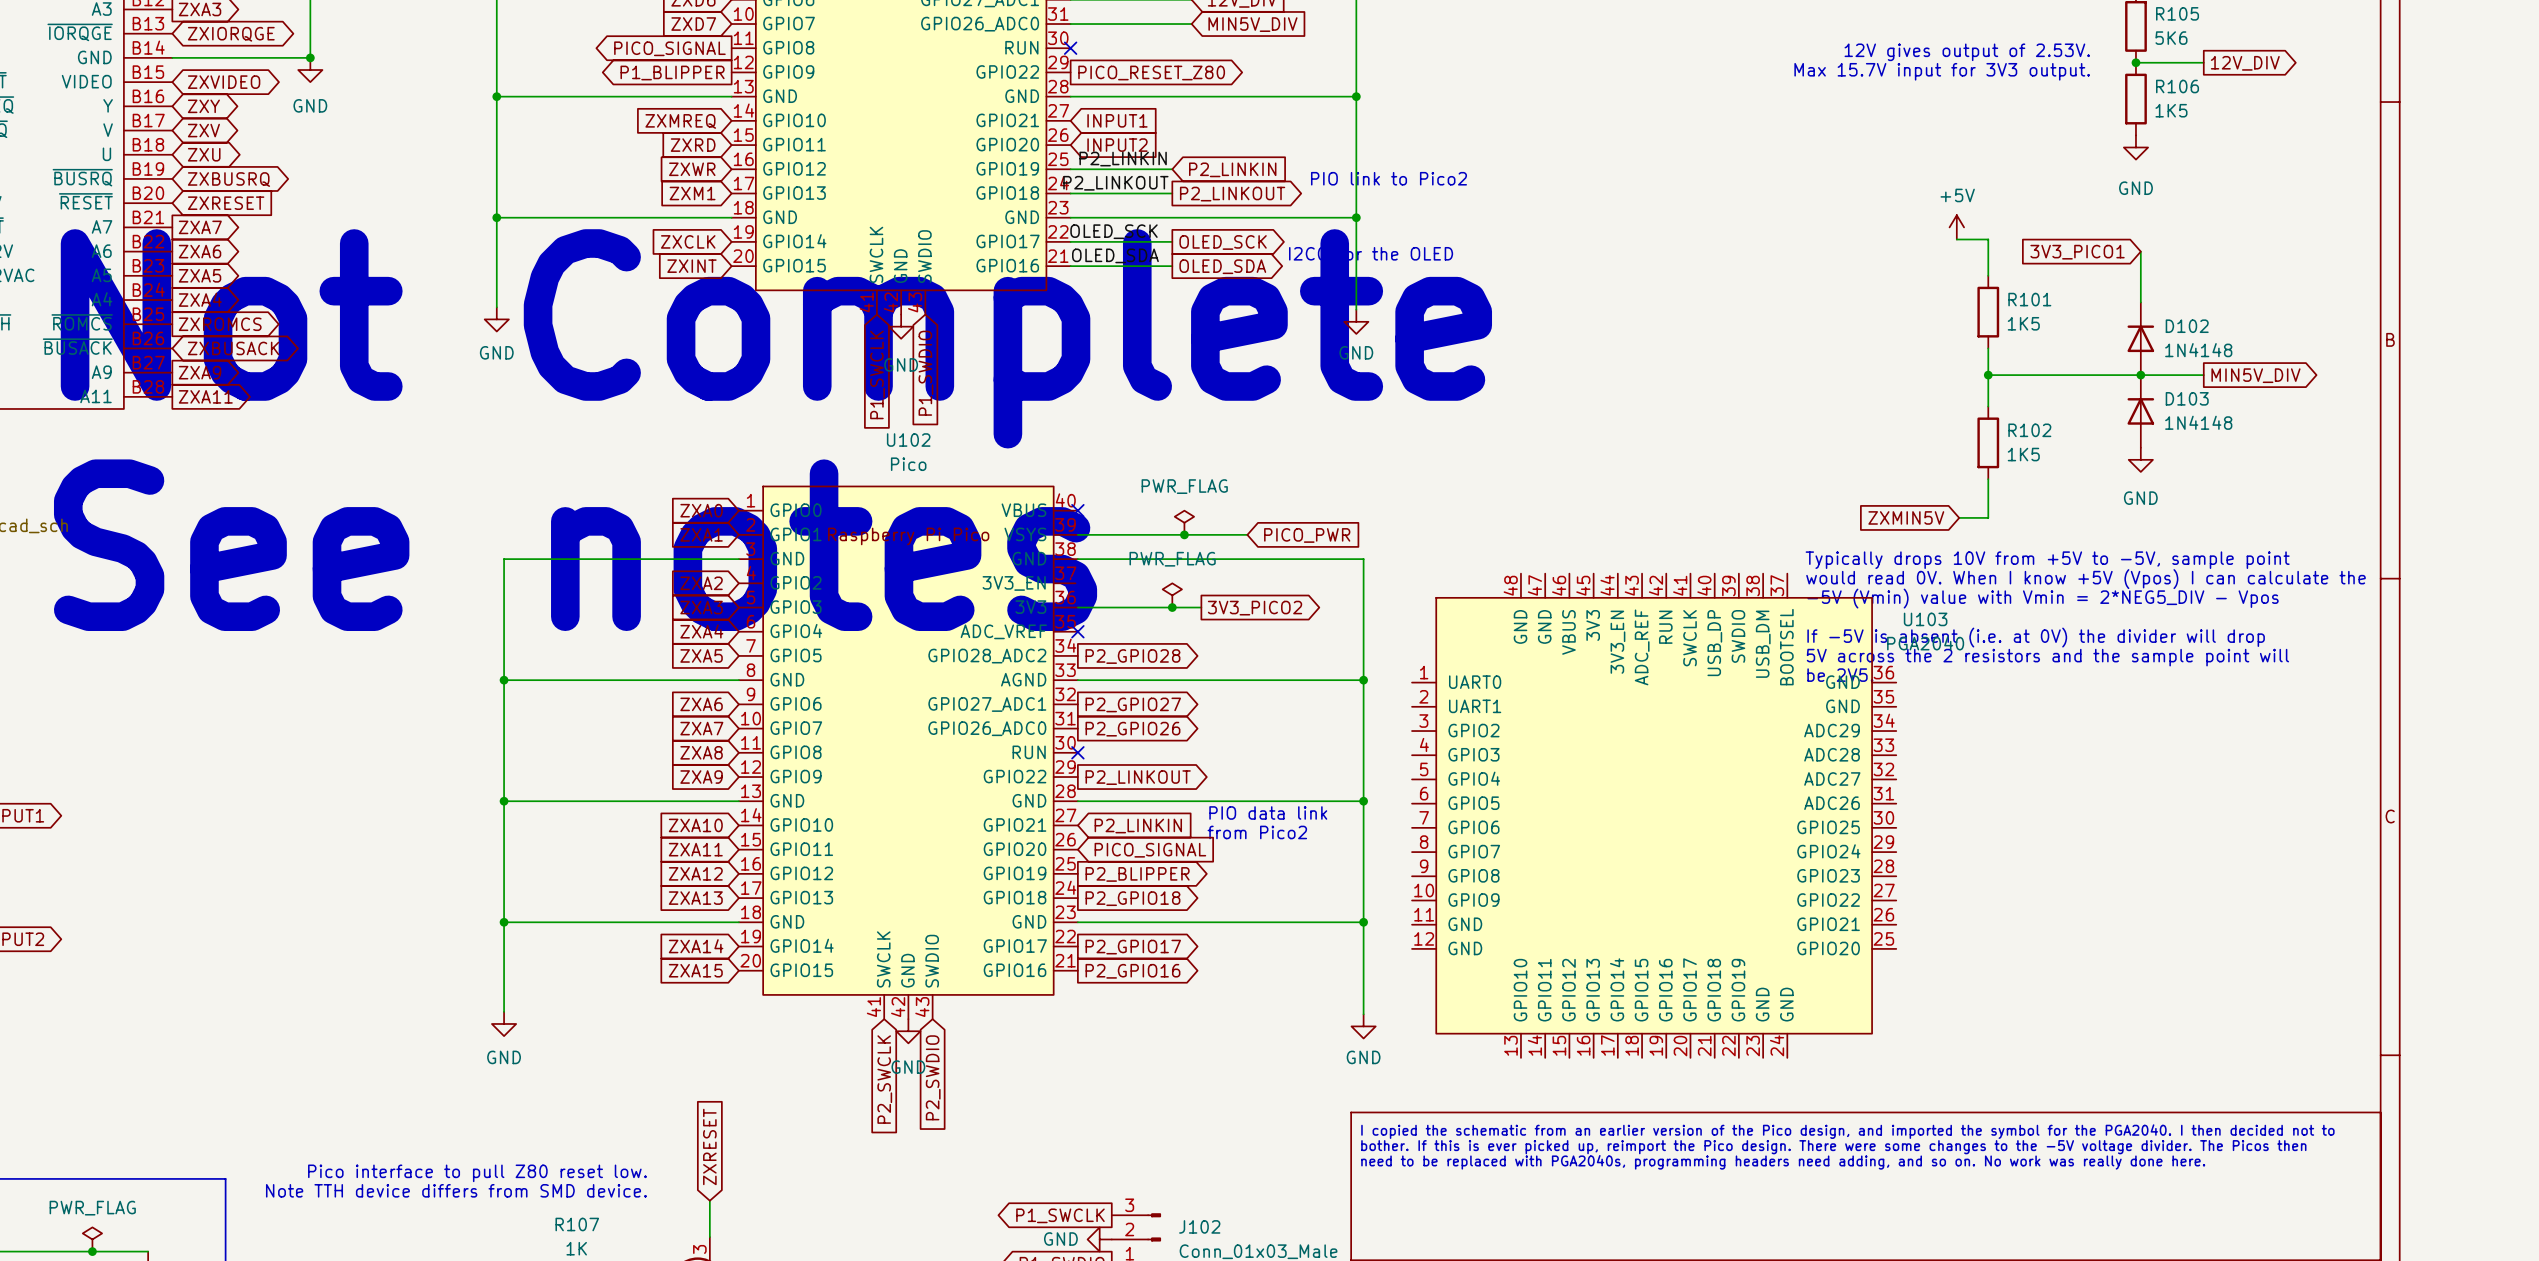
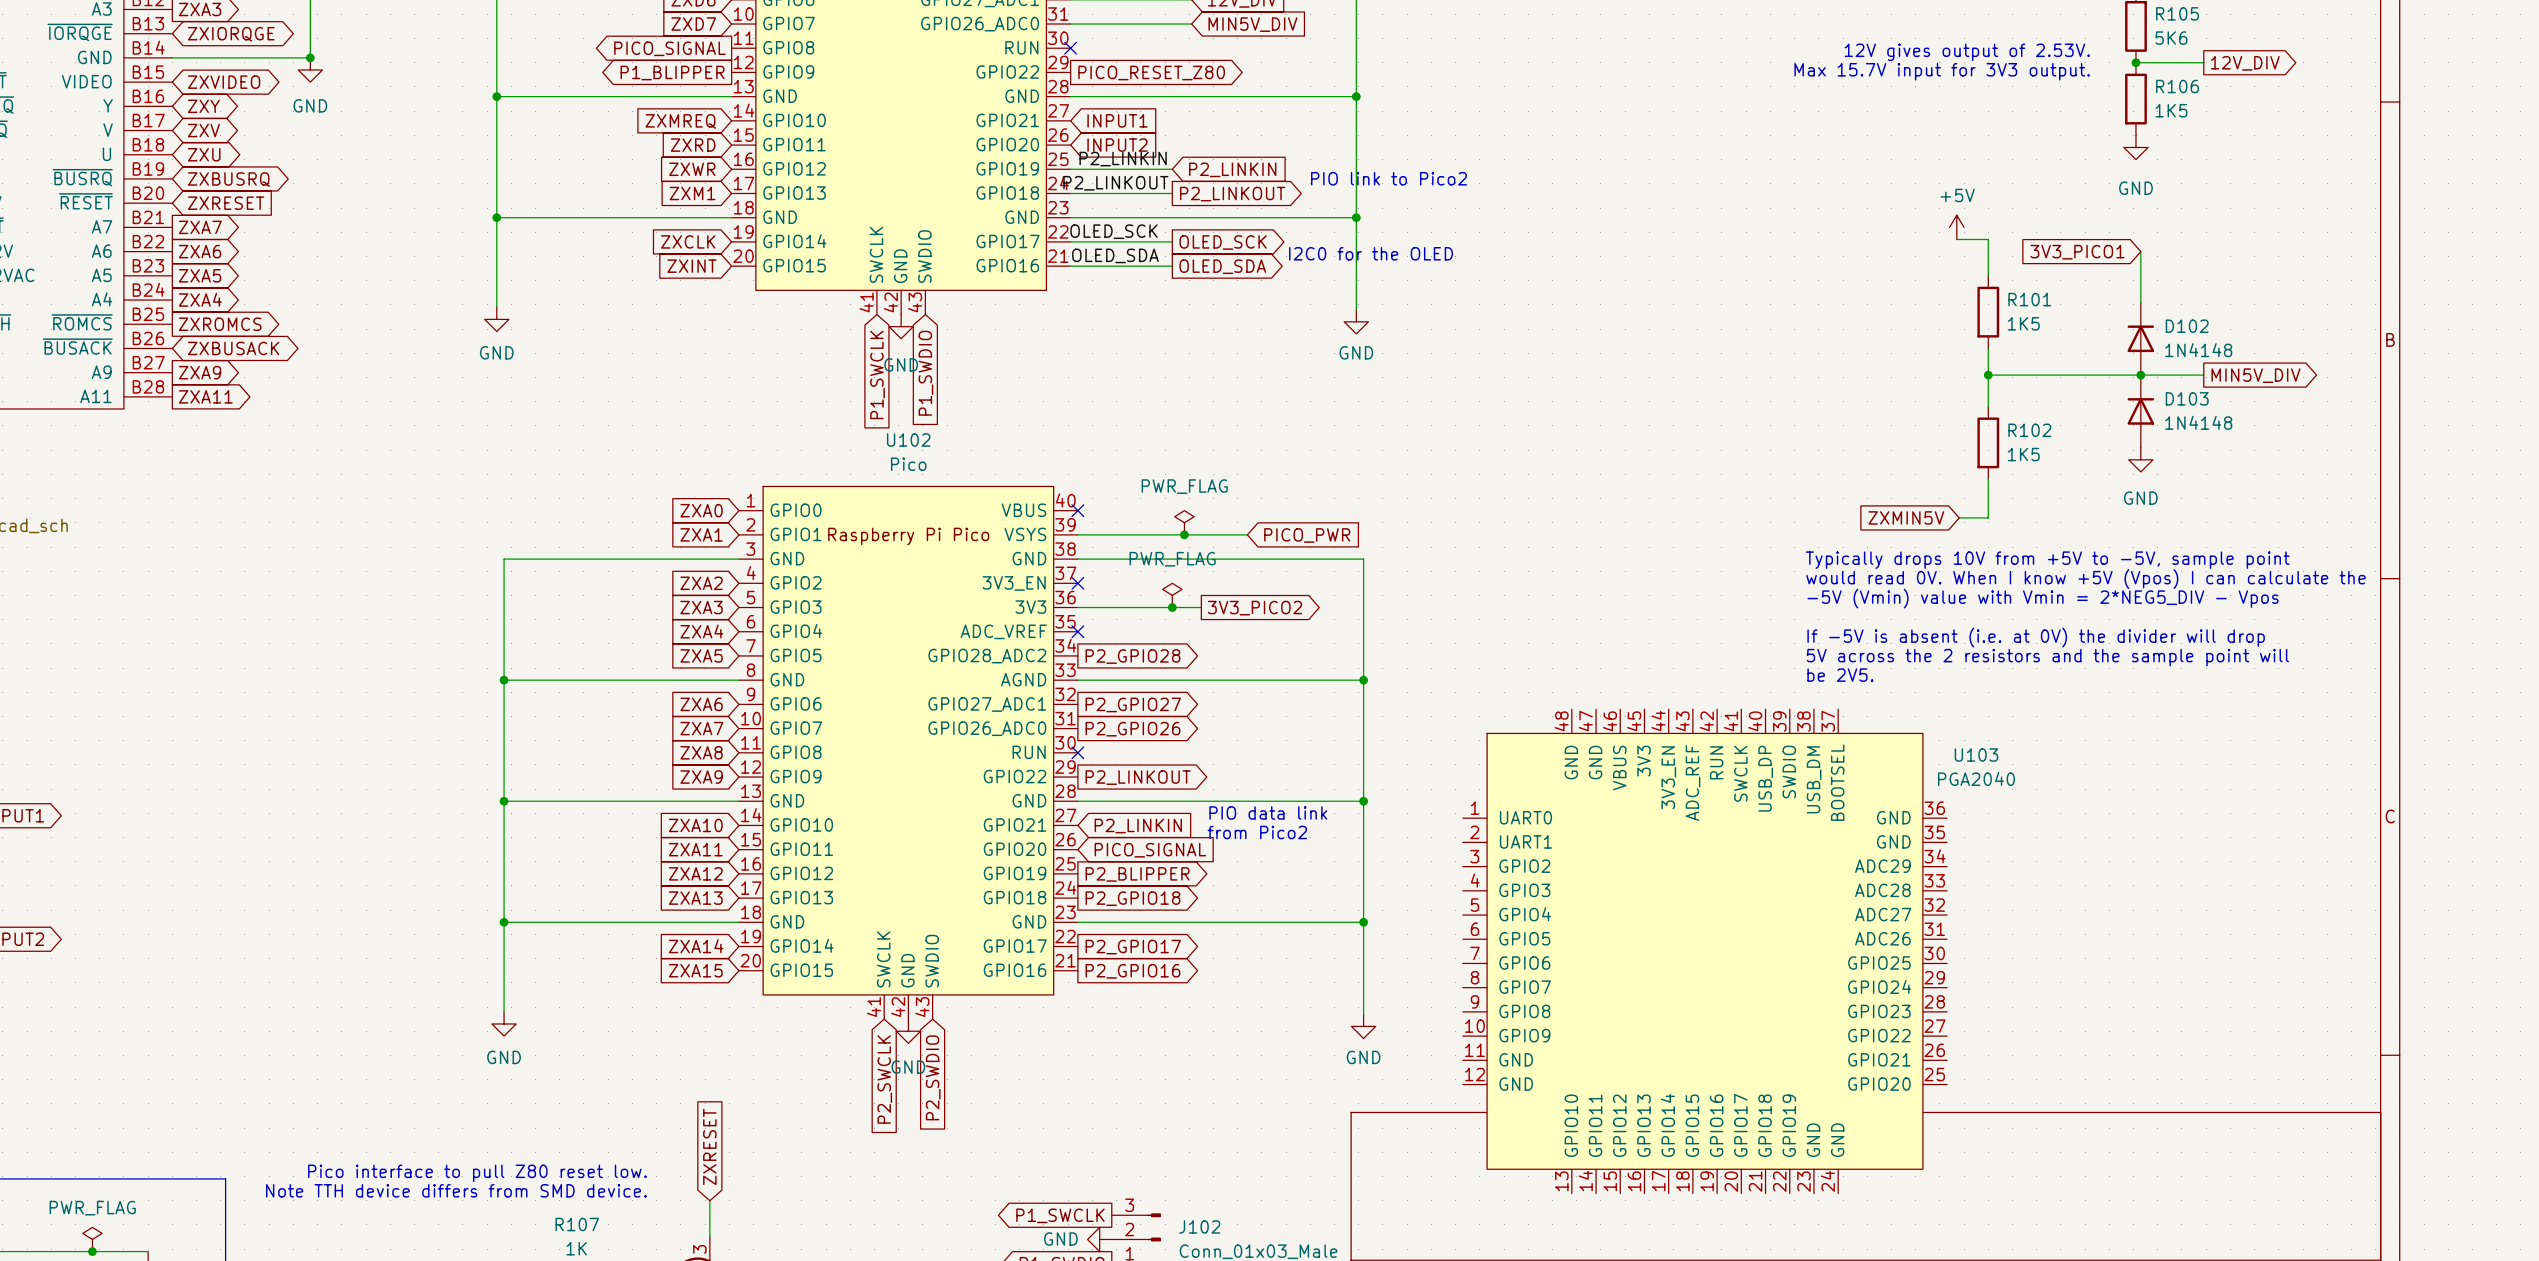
text: Not Complete (776, 338) -> none
text: See notes (575, 545) -> none
U103 position: (1654, 815) -> (1705, 951)
text: I copied the schematic from an earlier version of the Pico design, and imported the symbol for the PGA2040. I then decided not to (1847, 1131) -> none
text: bother. If this is ever picked up, reimport the Pico design. There were some changes to the -5V voltage divider. The Picos then (1833, 1147) -> none
text: need to be replaced with PGA2040s, programming headers need adding, and so on. No work was really done here. (1783, 1162) -> none

